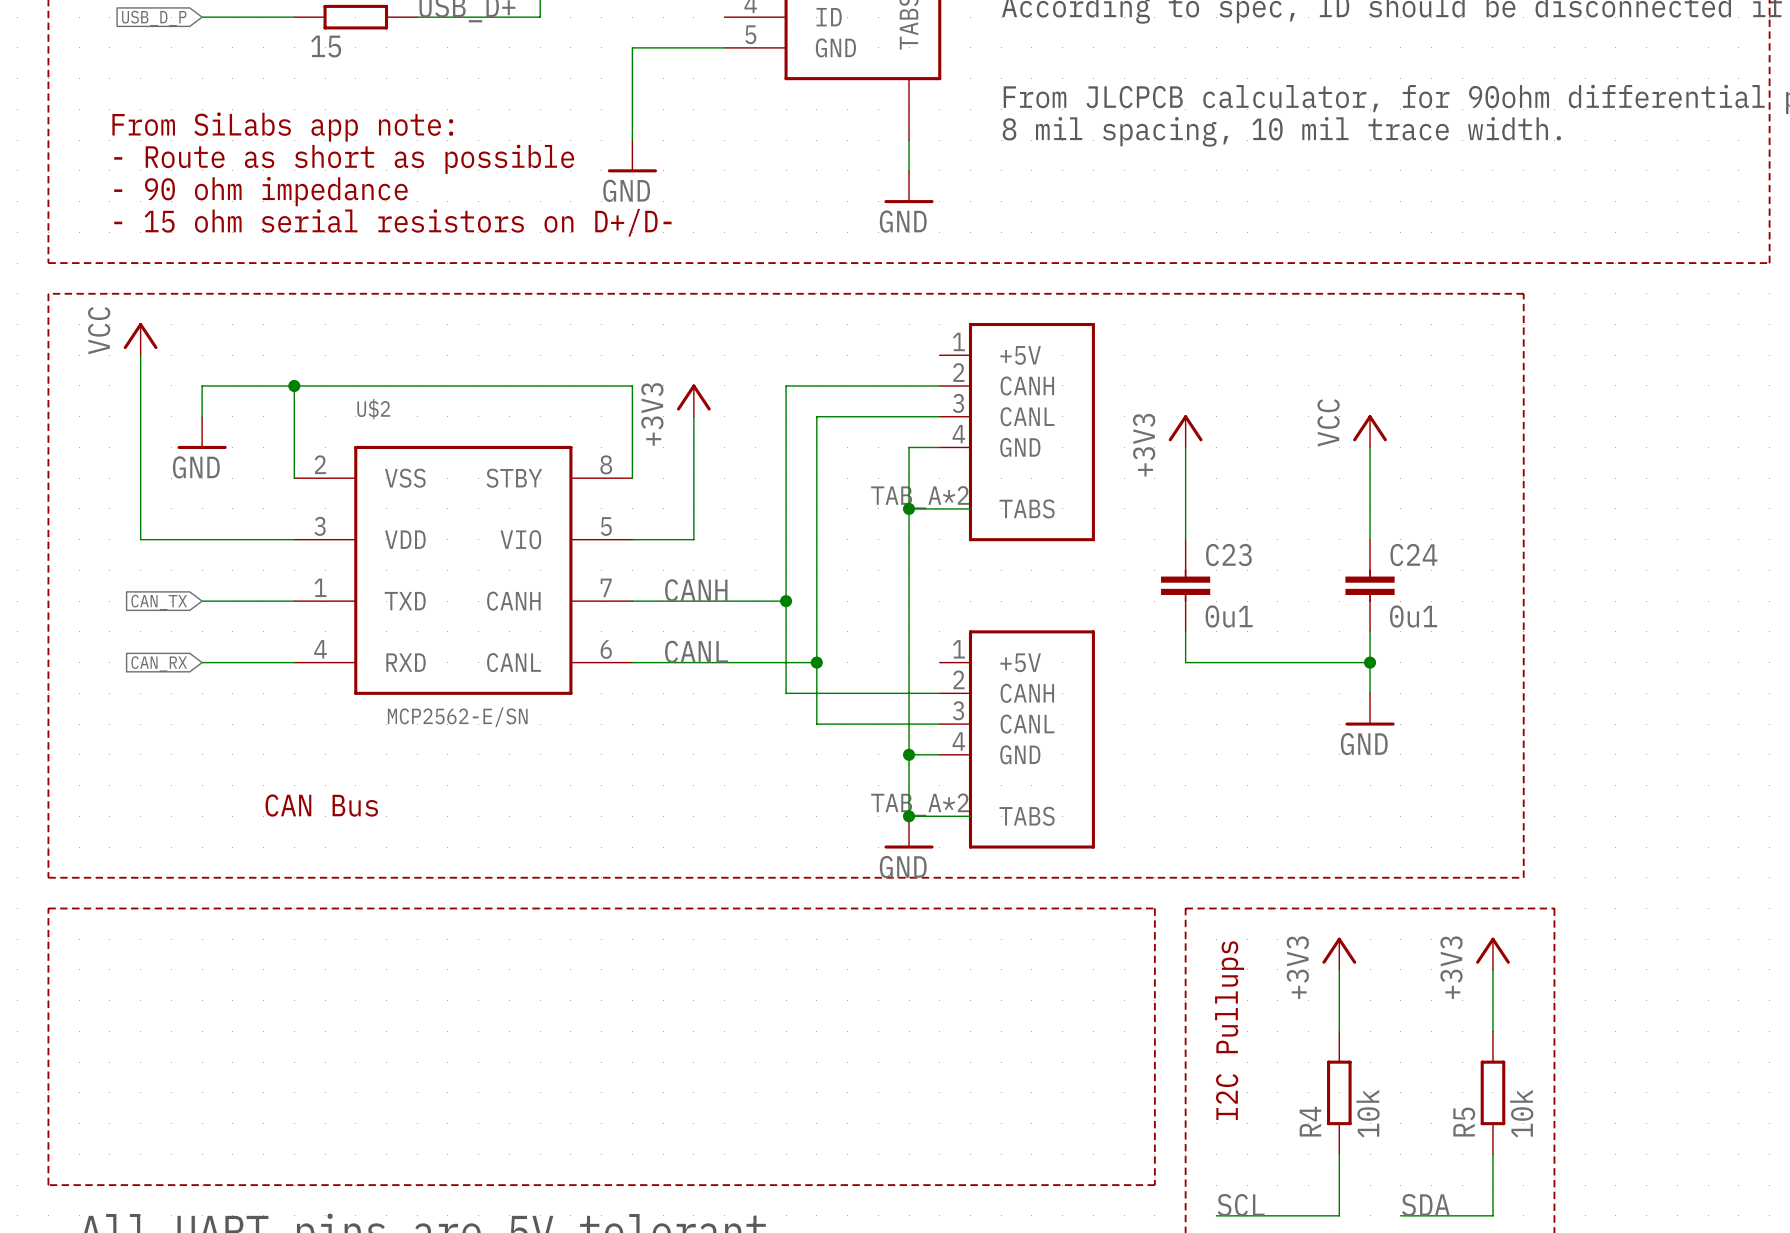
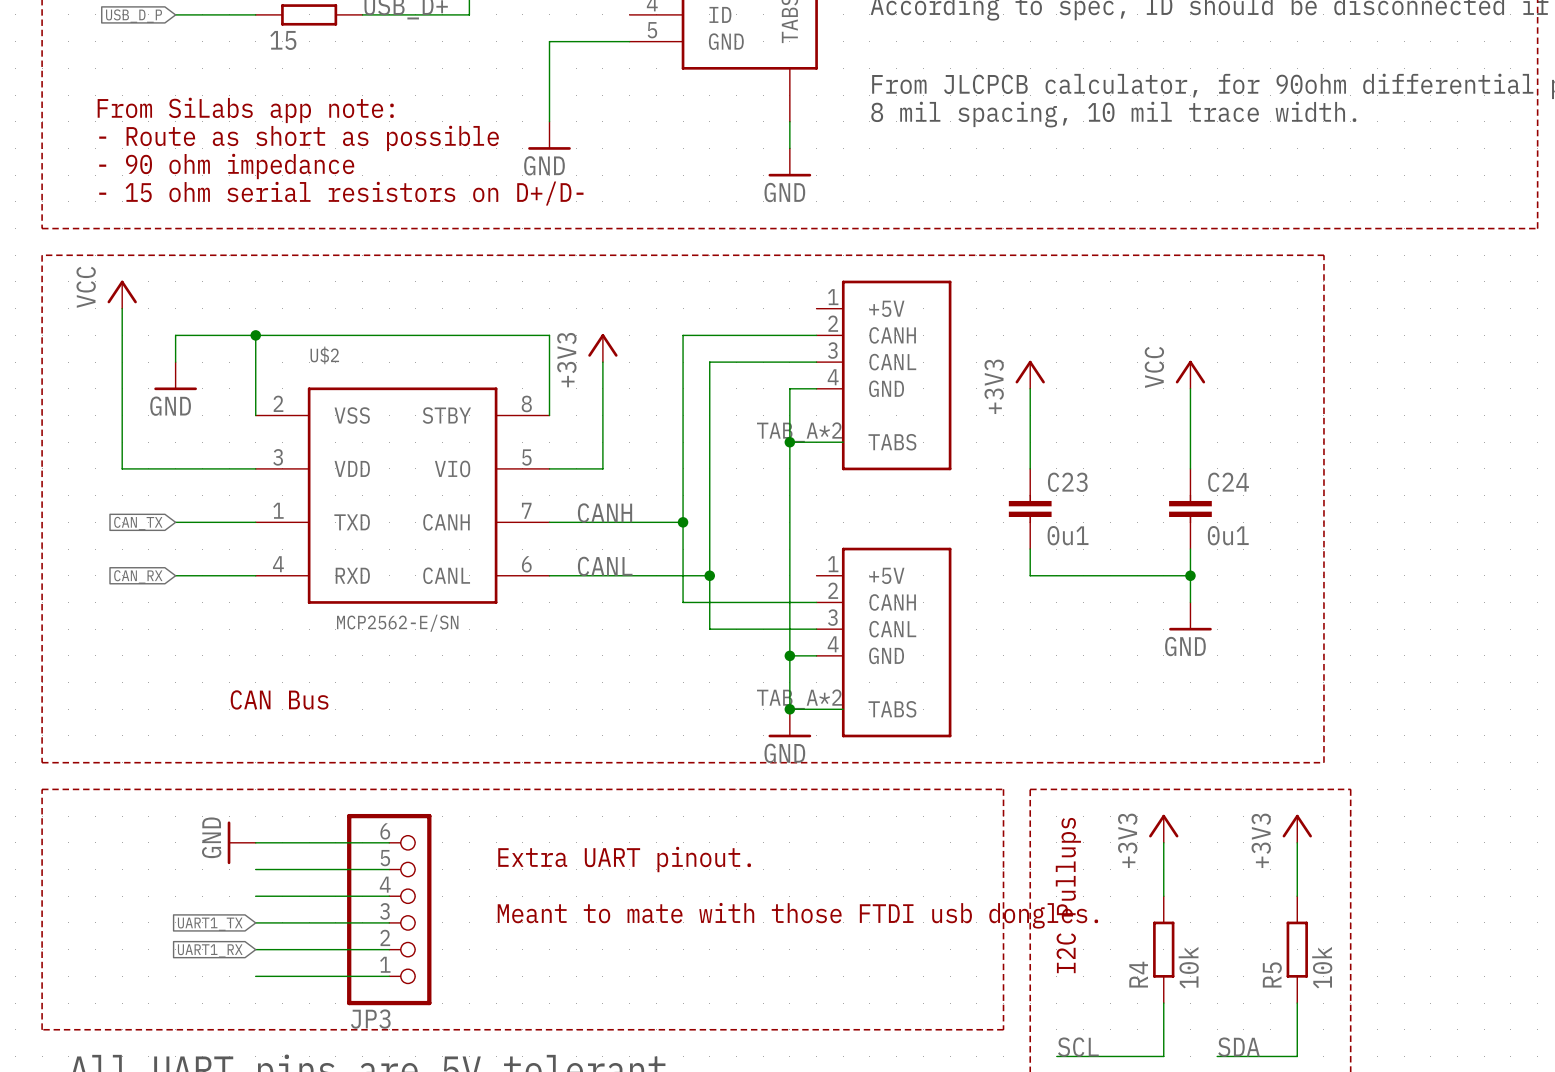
power symbol: none -> GND (241, 842)
wire: none -> (255, 842) (389, 842)
text: none -> Extra UART pinout. (624, 859)
wire: none -> (255, 869) (389, 869)
wire: none -> (255, 896) (389, 896)
JP3: none -> (389, 909)
text: none -> Meant to mate with those FTDI usb dongles. (797, 915)
wire: none -> (255, 922) (389, 922)
global label: none -> UART1_TX (210, 924)
wire: none -> (255, 949) (389, 949)
global label: none -> UART1_RX (210, 950)
wire: none -> (255, 976) (389, 976)

